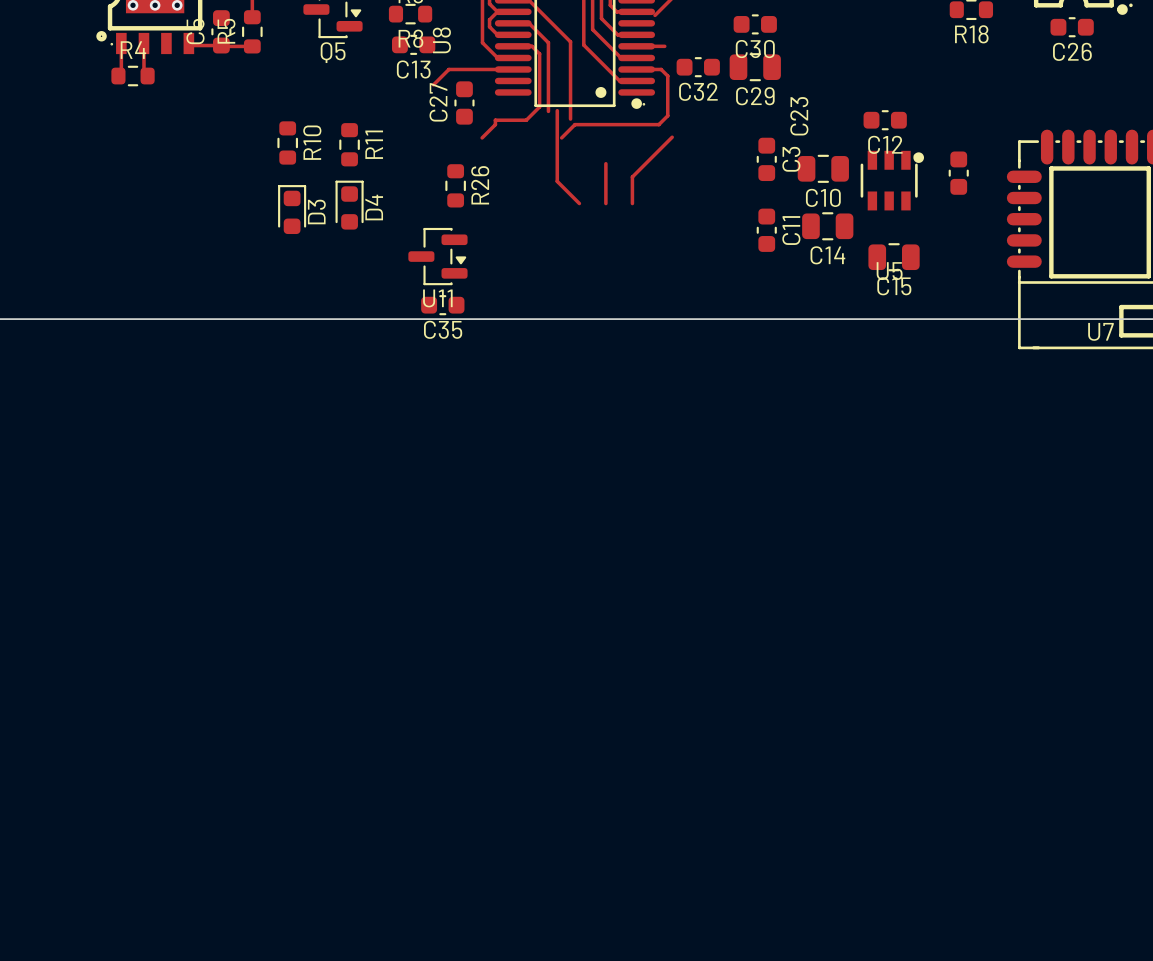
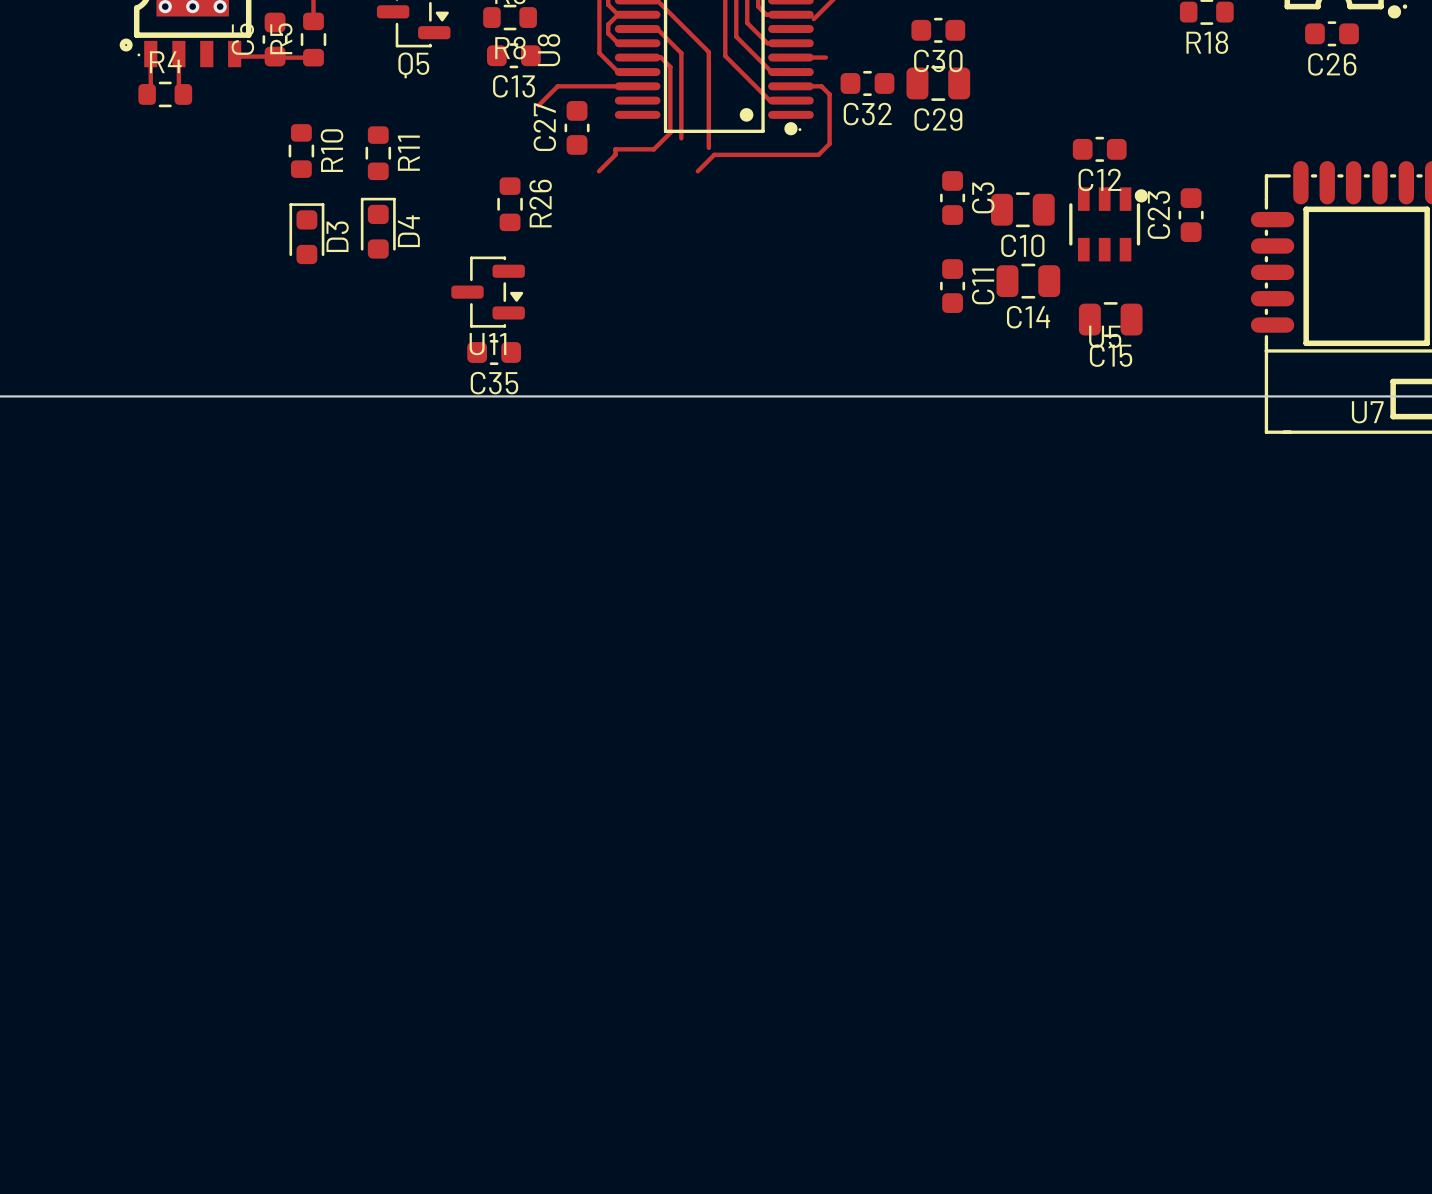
track: (557, 110) (557, 181) (579, 203) -> none
C23 name position: C23 (799, 116) -> C23 (1158, 214)
track: (672, 137) (632, 177) (632, 203) -> none
R10 position: (287, 142) -> (301, 151)
R11 position: (349, 144) -> (378, 153)
track: (605, 163) (605, 203) -> none
R26 position: (455, 185) -> (510, 204)
D4 position: (349, 205) -> (378, 228)
D3 position: (292, 209) -> (306, 233)
U11 position: (437, 256) -> (488, 292)
C35 position: (442, 305) -> (494, 352)

